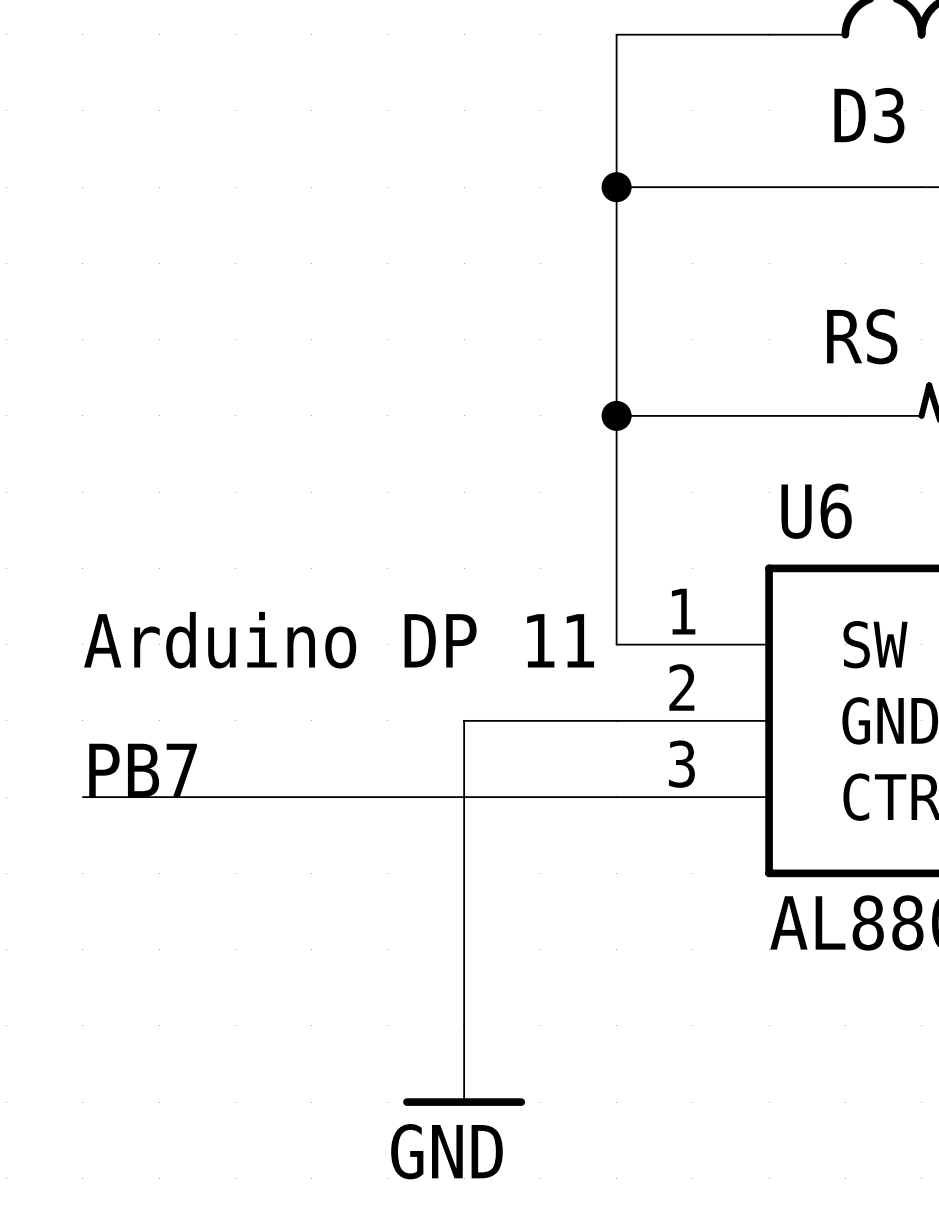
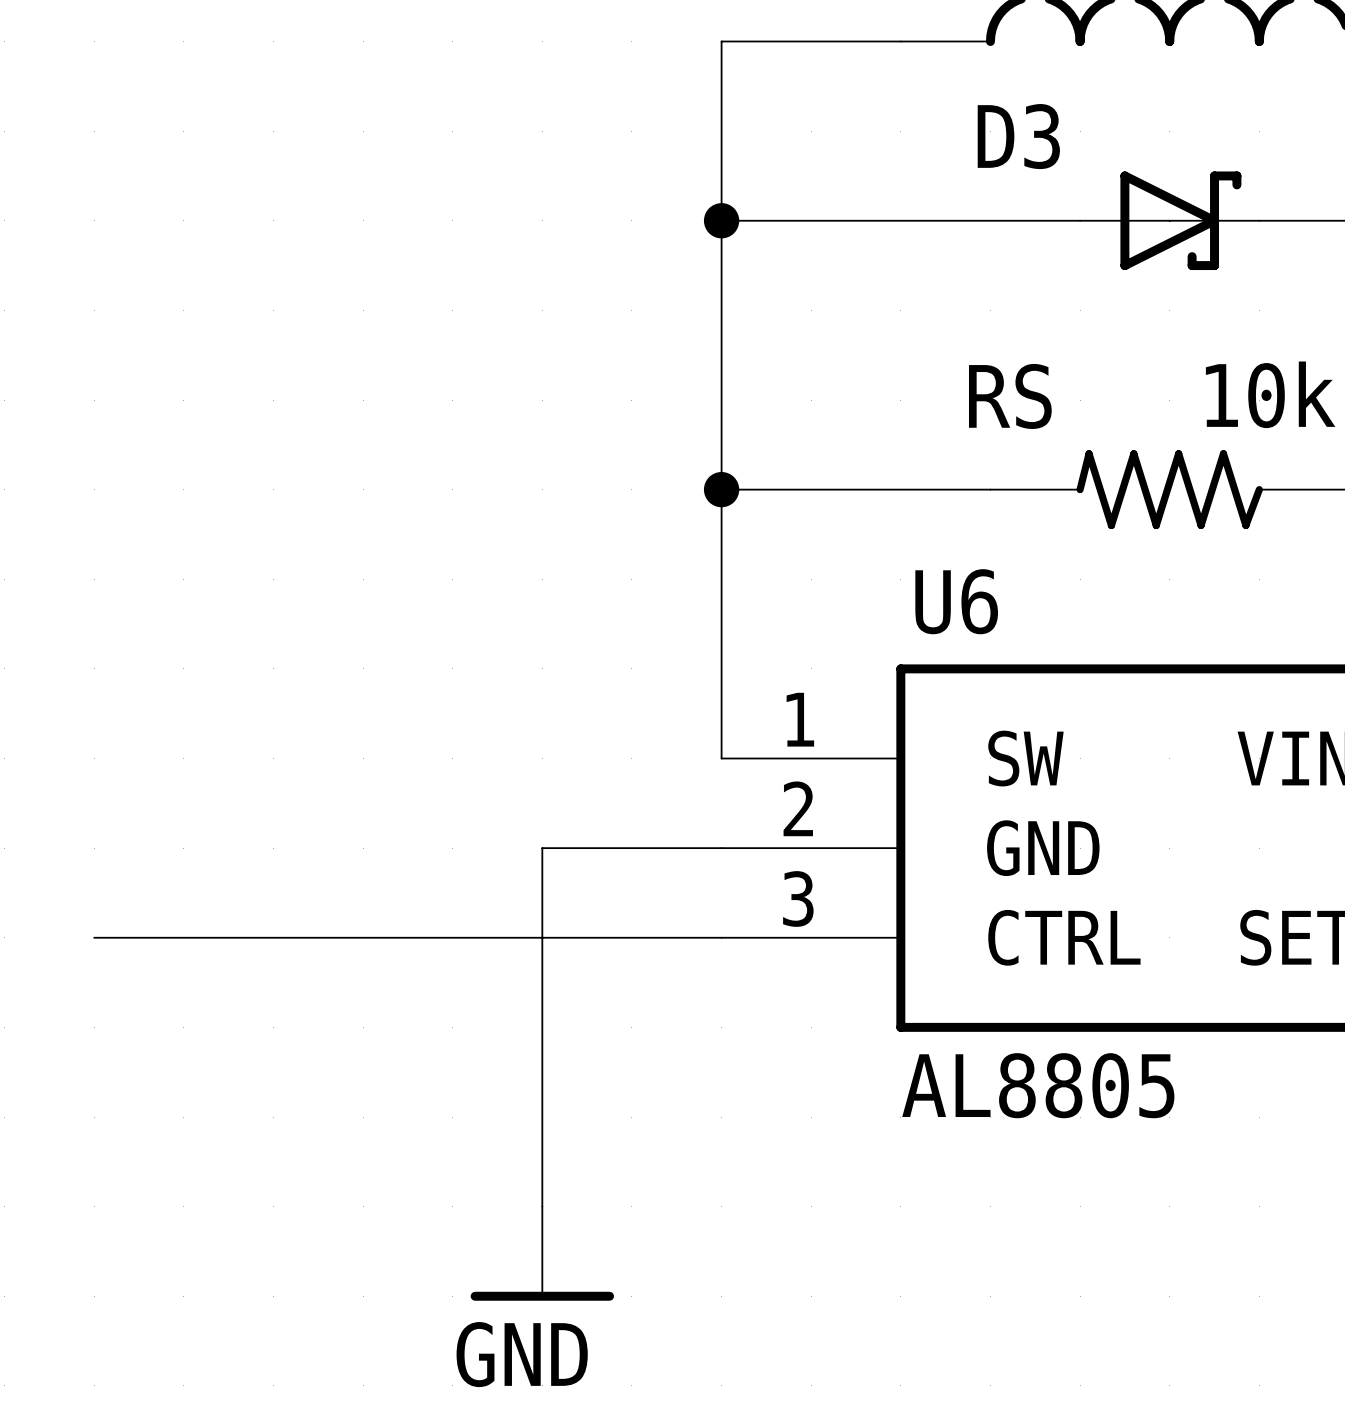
text: Arduino DP 11 (339, 640) -> none
label: PB7 (143, 770) -> none

